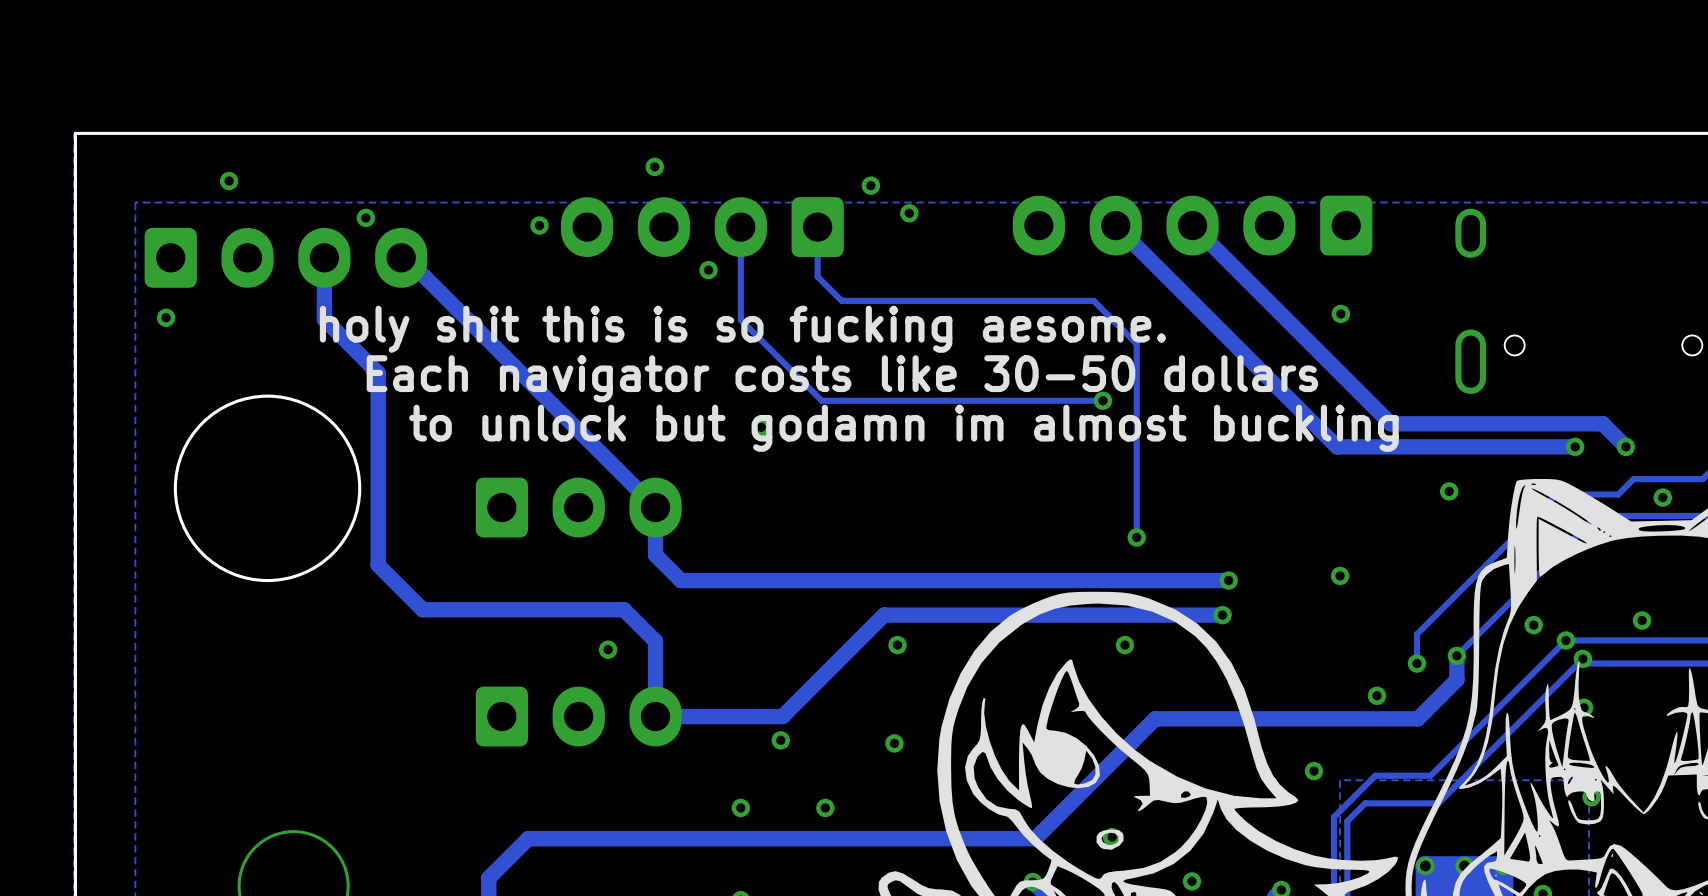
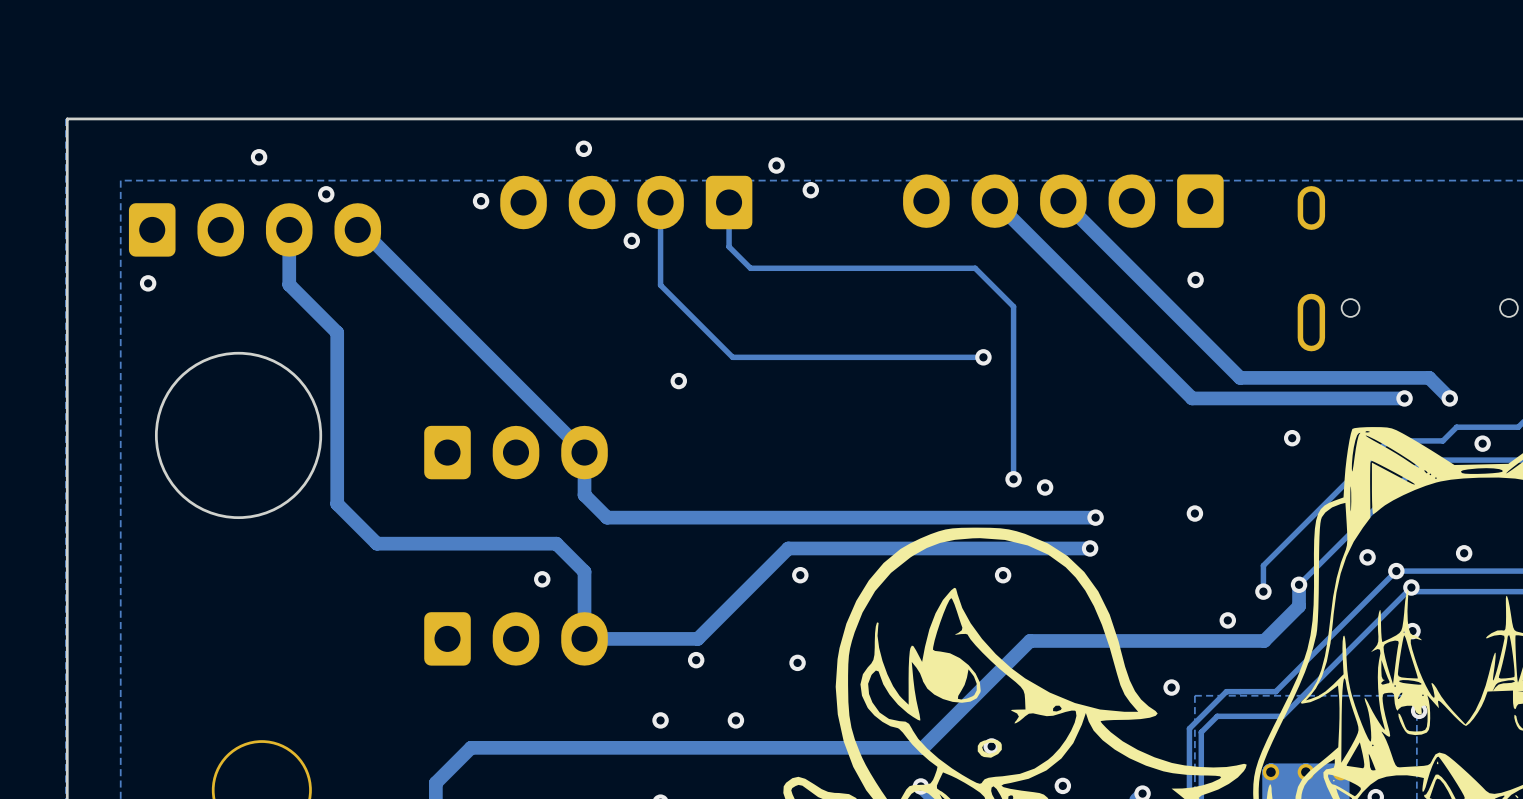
via position: (229, 181) -> (259, 157)
text: holy shit this is so fucking aesome. (742, 329) -> none
text: Each navigator costs like 30-50 dollars (842, 378) -> none
text: to unlock but godamn im almost buckling (903, 428) -> none
via: none -> (1045, 487)

